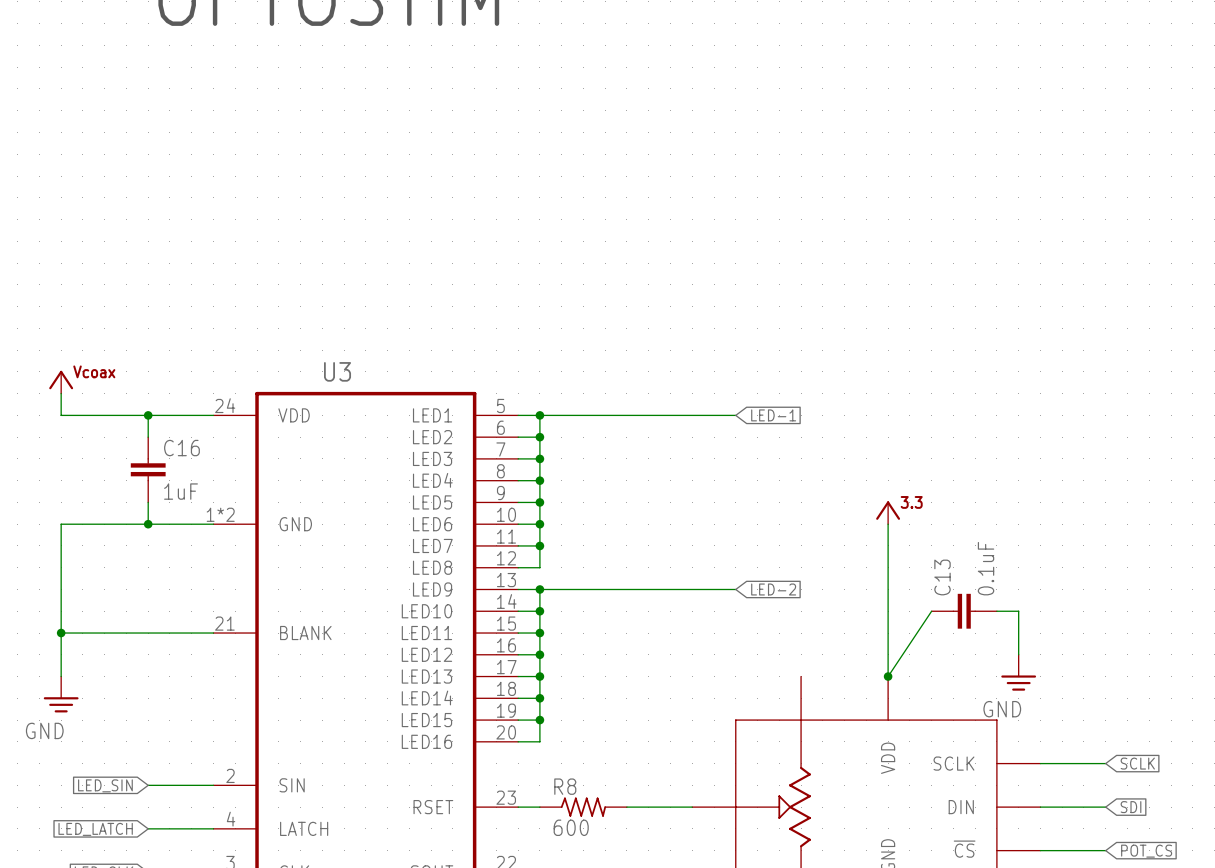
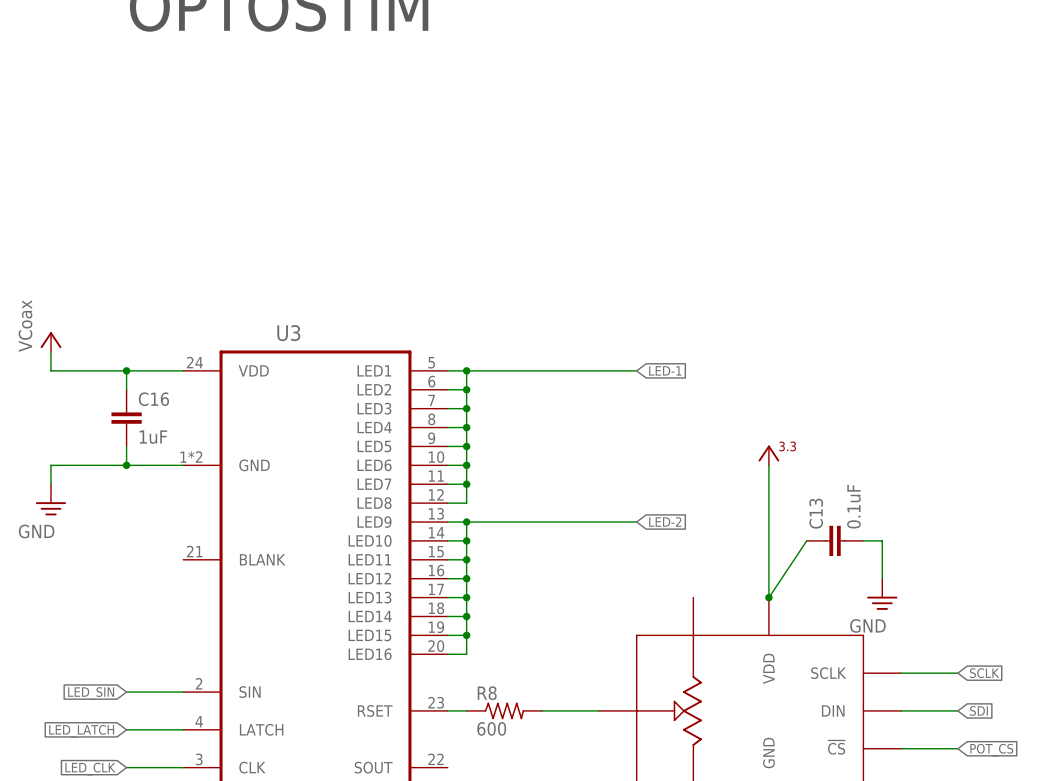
power symbol text: none -> VCoax (25, 326)
power symbol text: Vcoax (94, 371) -> none
wire: (61, 545) (61, 676) -> none
wire: (61, 633) (213, 633) -> none
junction: (61, 633) -> none
power symbol position: GND (61, 694) -> GND (51, 499)

